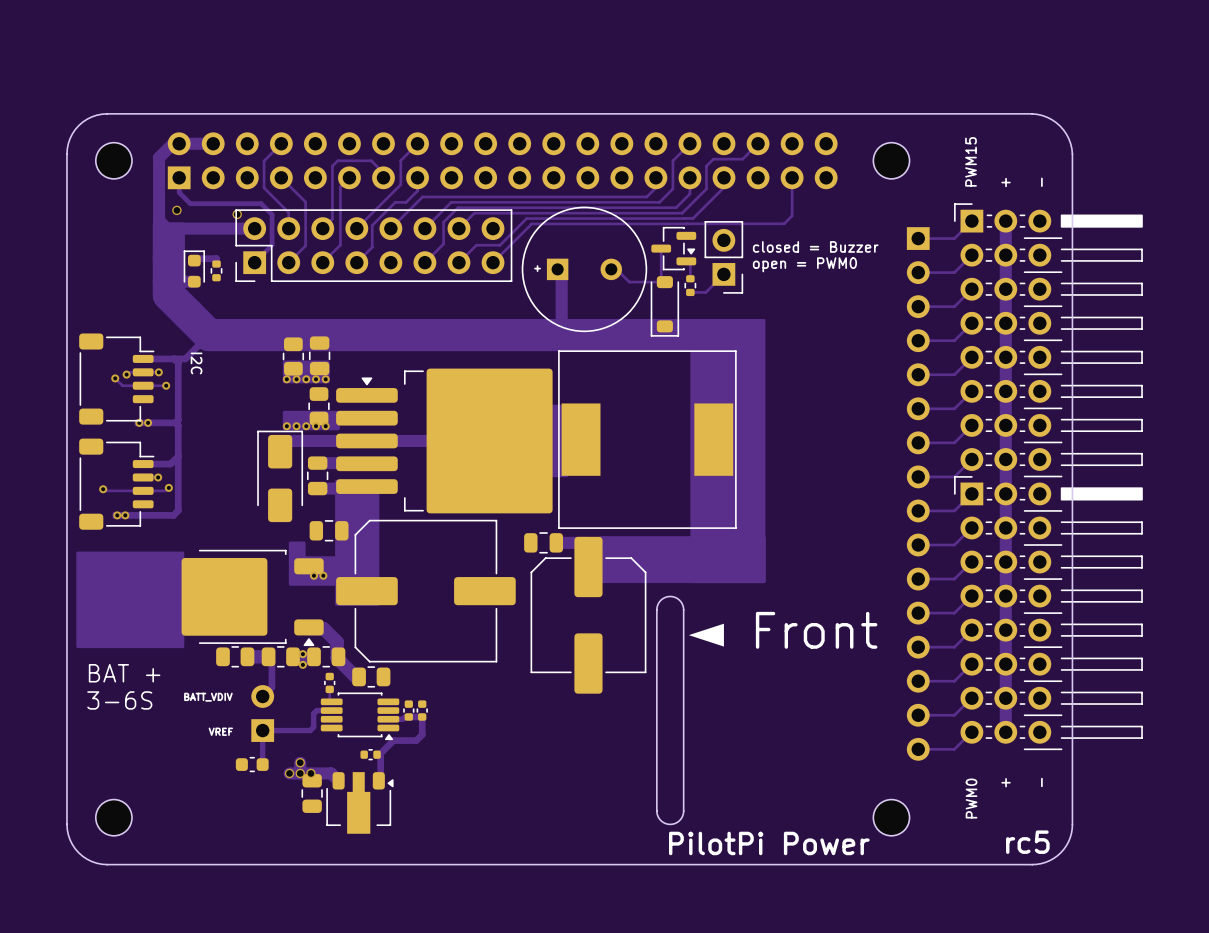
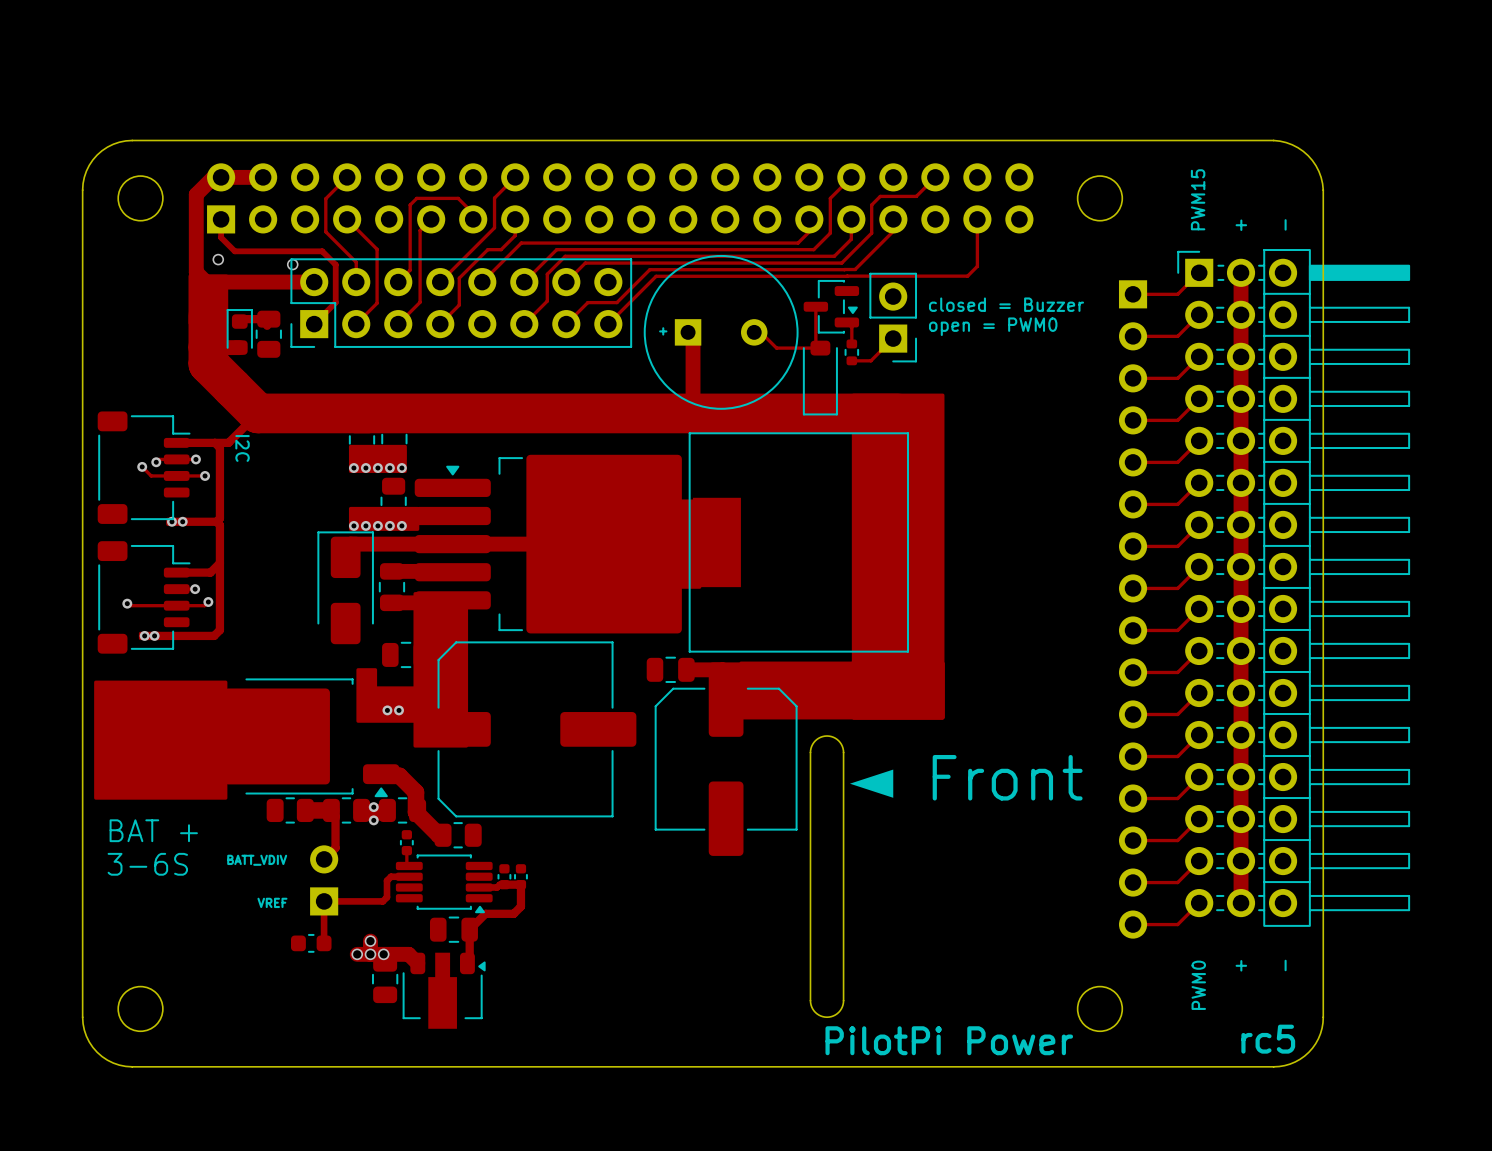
part footprint: [210, 260, 223, 282] -> [255, 310, 282, 358]
part: (1048, 340) -> none
part: none -> (1293, 587)
part: (1048, 613) -> none
part footprint: [360, 749, 381, 761] -> [429, 916, 478, 943]

